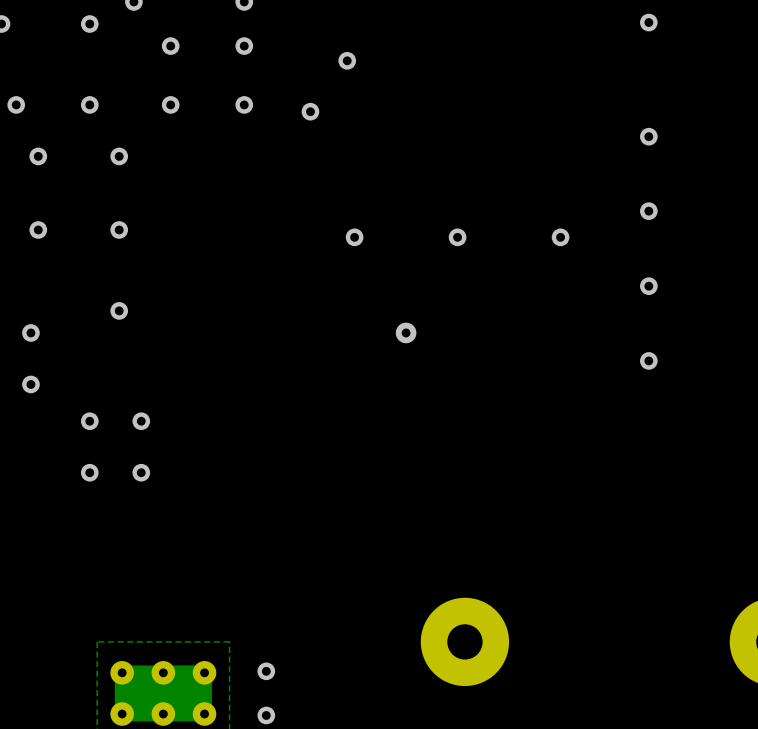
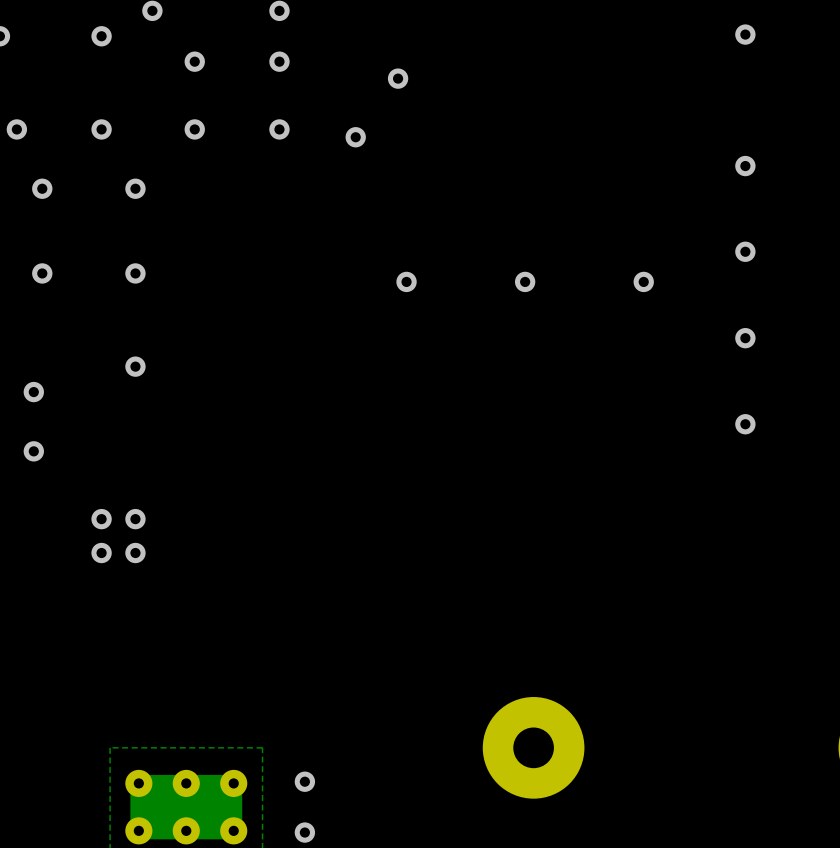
via: (406, 332) -> none
via: (89, 421) -> none
via: (141, 421) -> none
via: none -> (101, 519)
via: none -> (135, 519)
via: none -> (135, 553)
via: (141, 472) -> none

